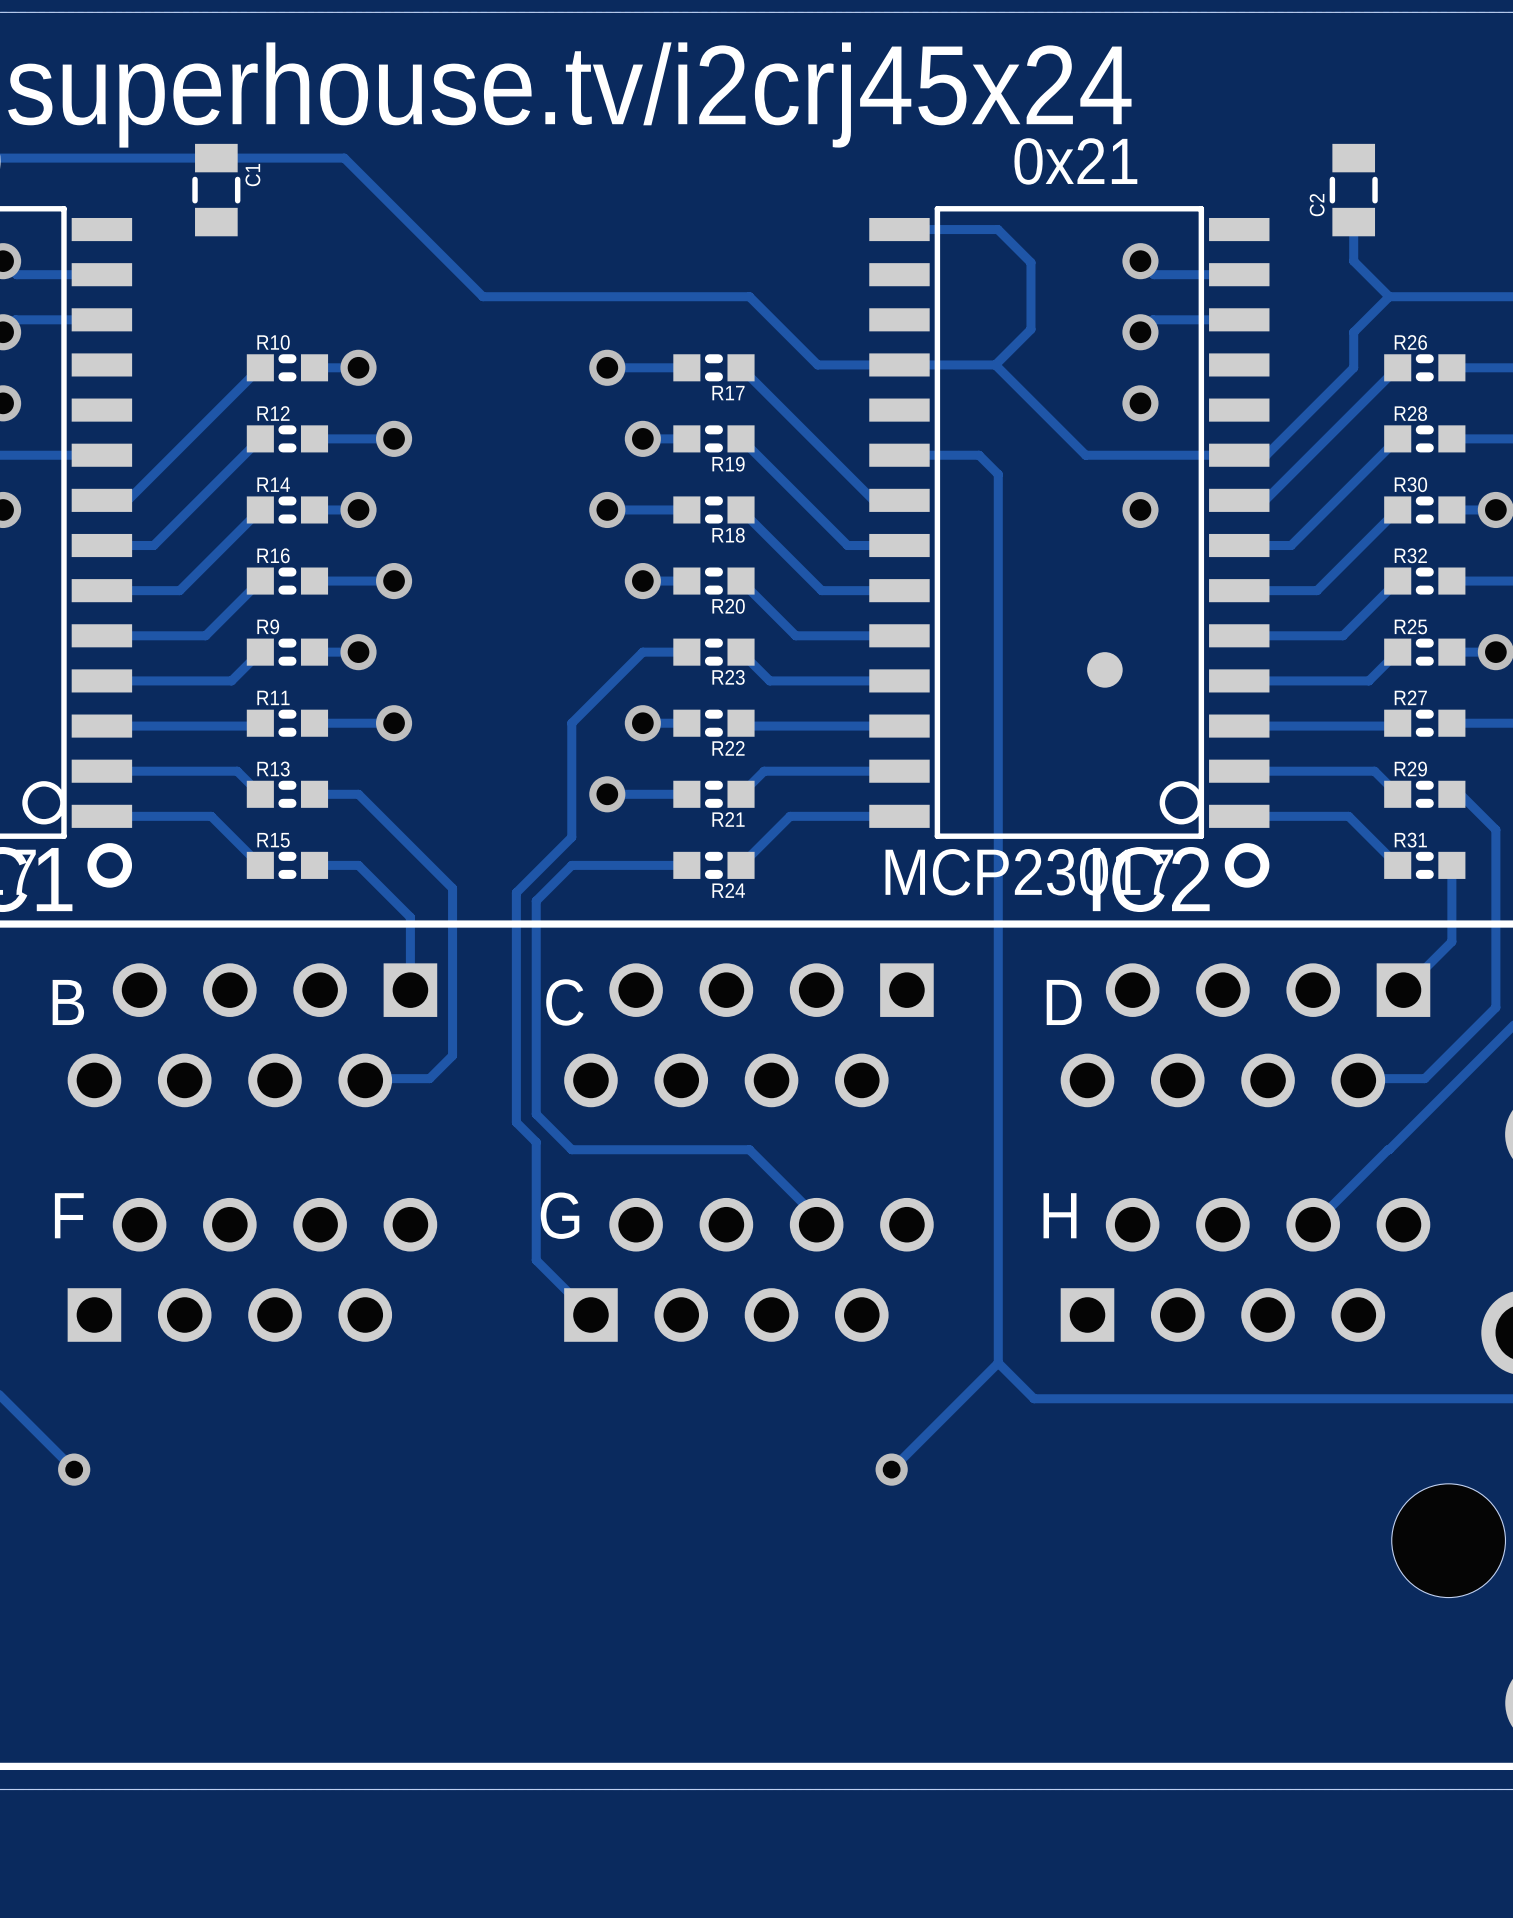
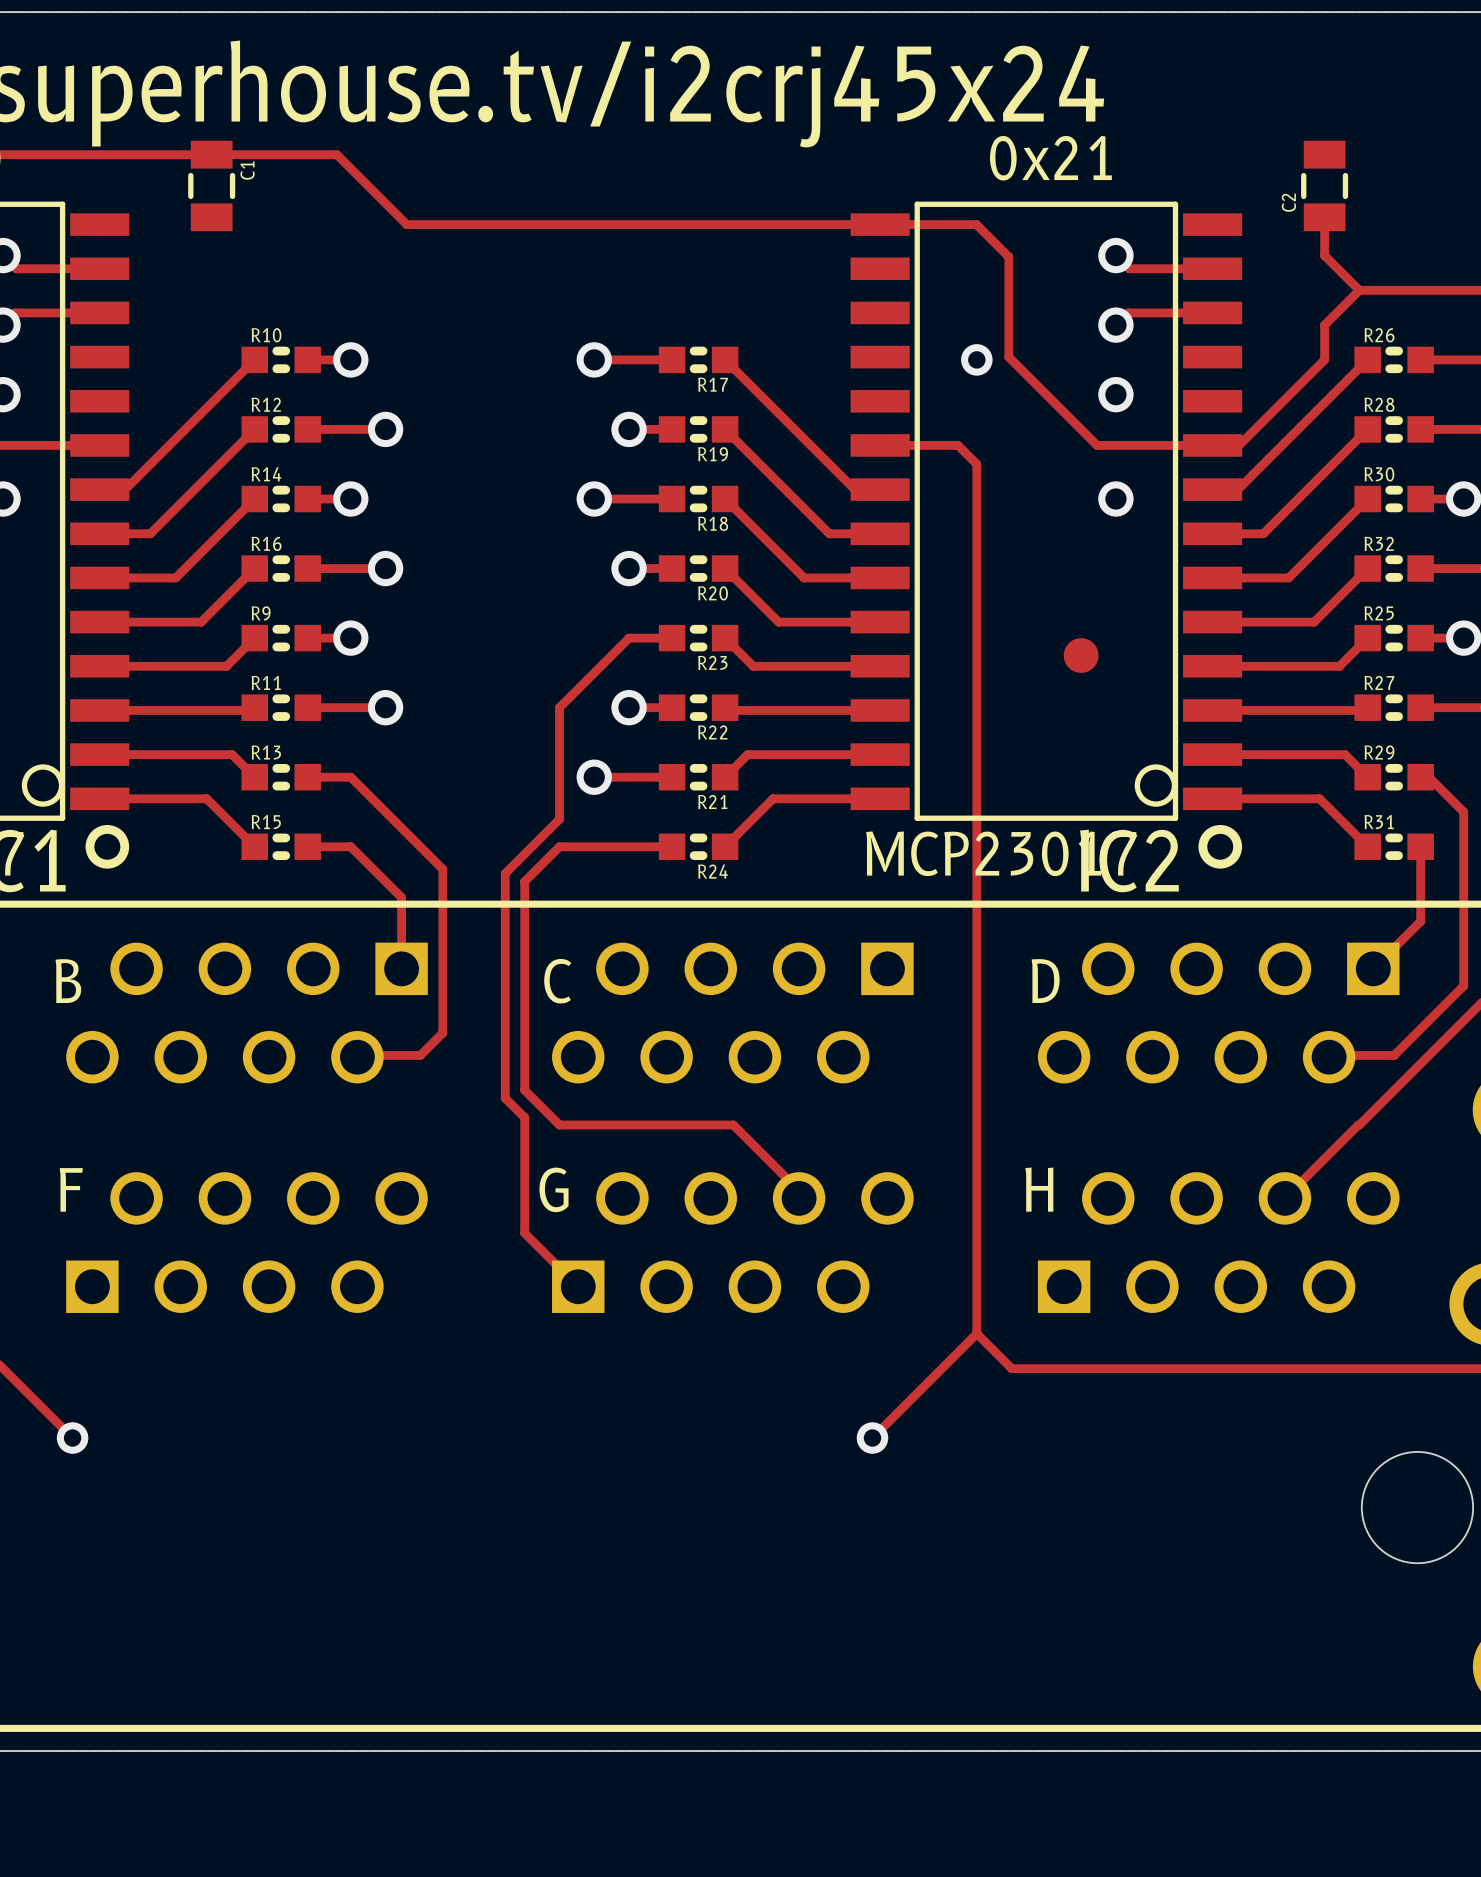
track: (415, 229) (482, 296) (749, 296) (817, 364) (995, 364) -> (406, 224) (880, 224)
track: (1030, 329) (995, 364) -> none
track: (995, 364) (1085, 455) (1121, 455) -> (1008, 322) (1008, 357) (1097, 445)
via: none -> (976, 359)

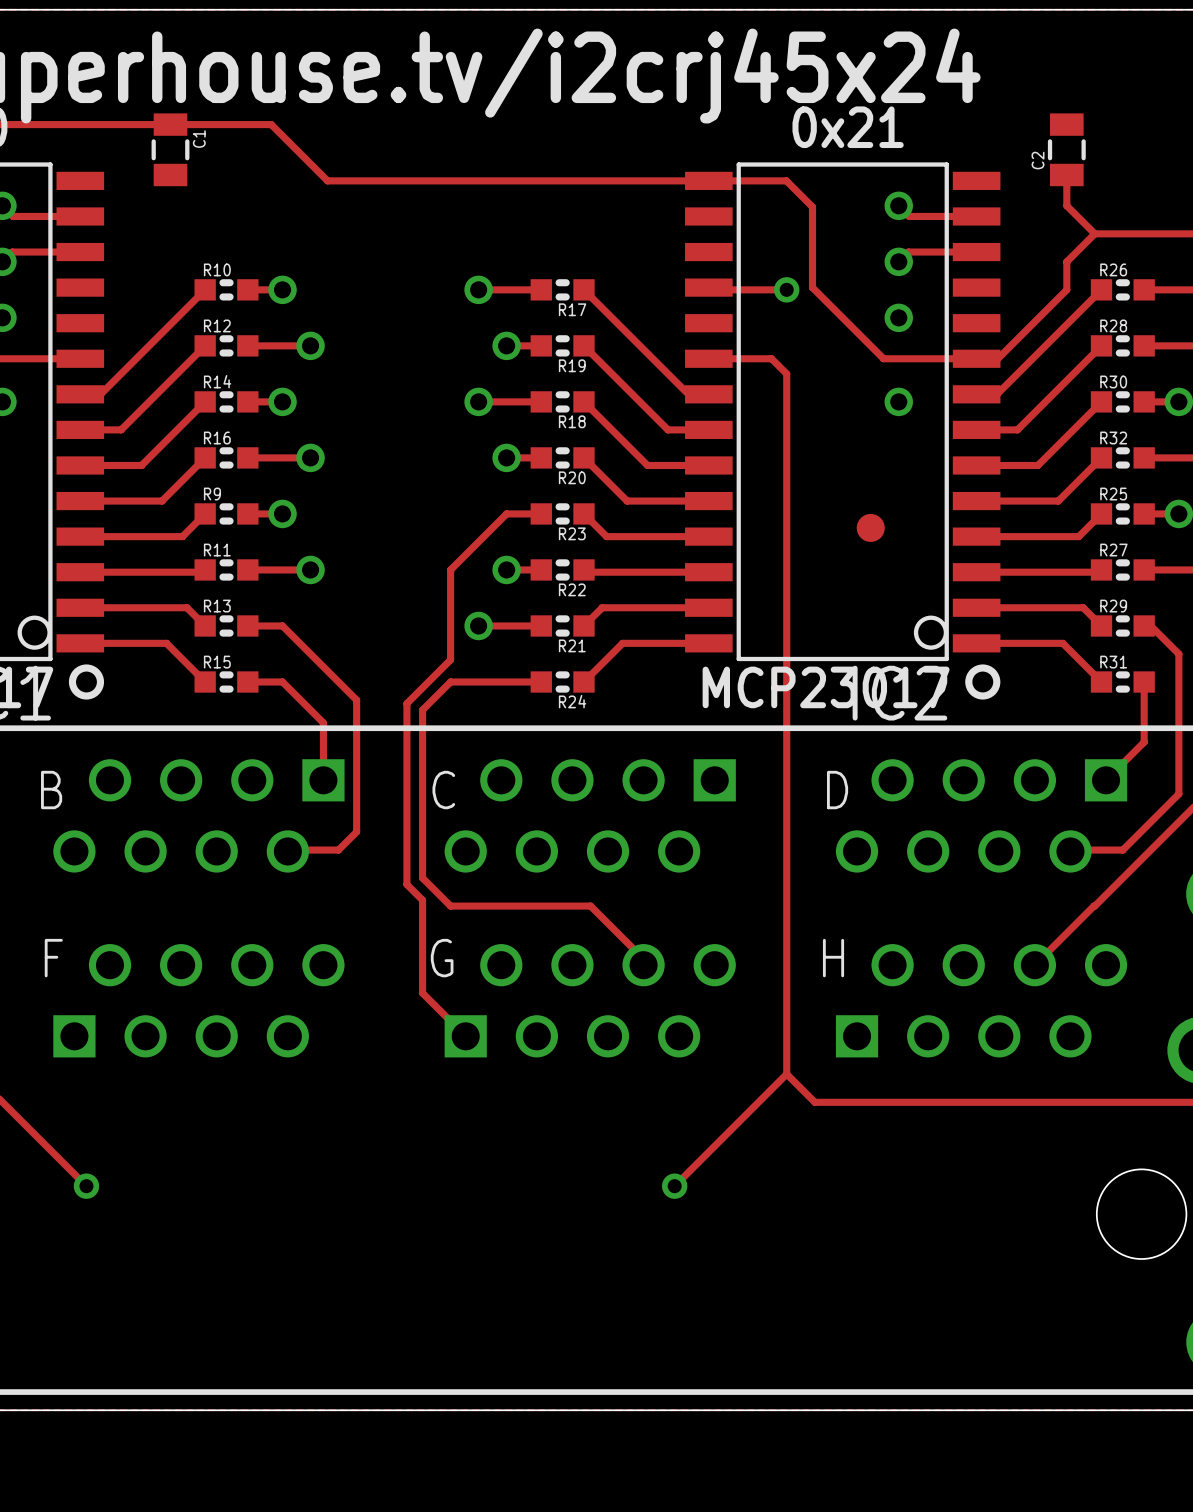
track: none -> (708, 287) (711, 289) (786, 289)
track: none -> (58, 1158) (86, 1186)
via position: (72, 1438) -> (86, 1186)
track: none -> (702, 1158) (674, 1186)
via position: (872, 1438) -> (674, 1186)

